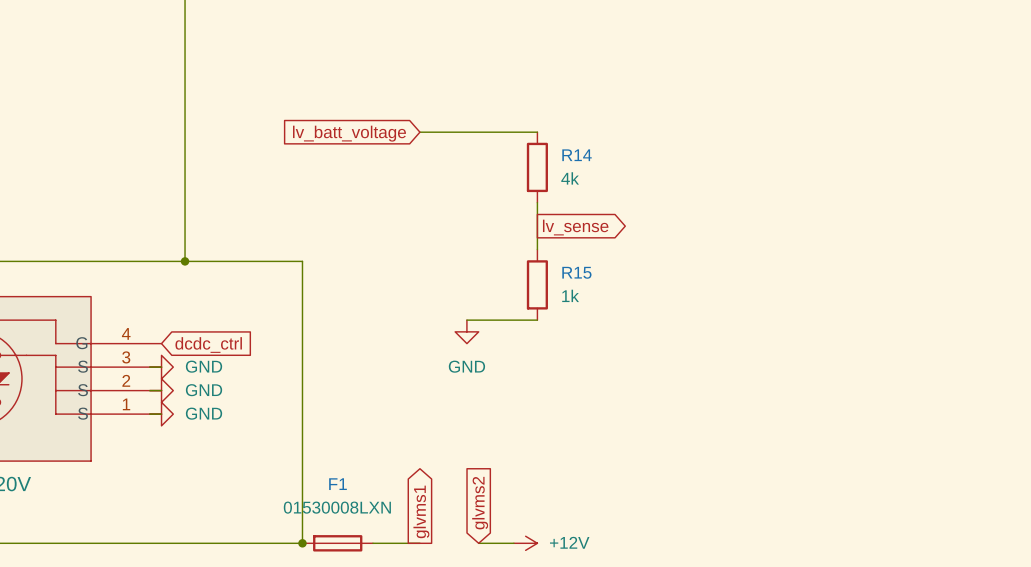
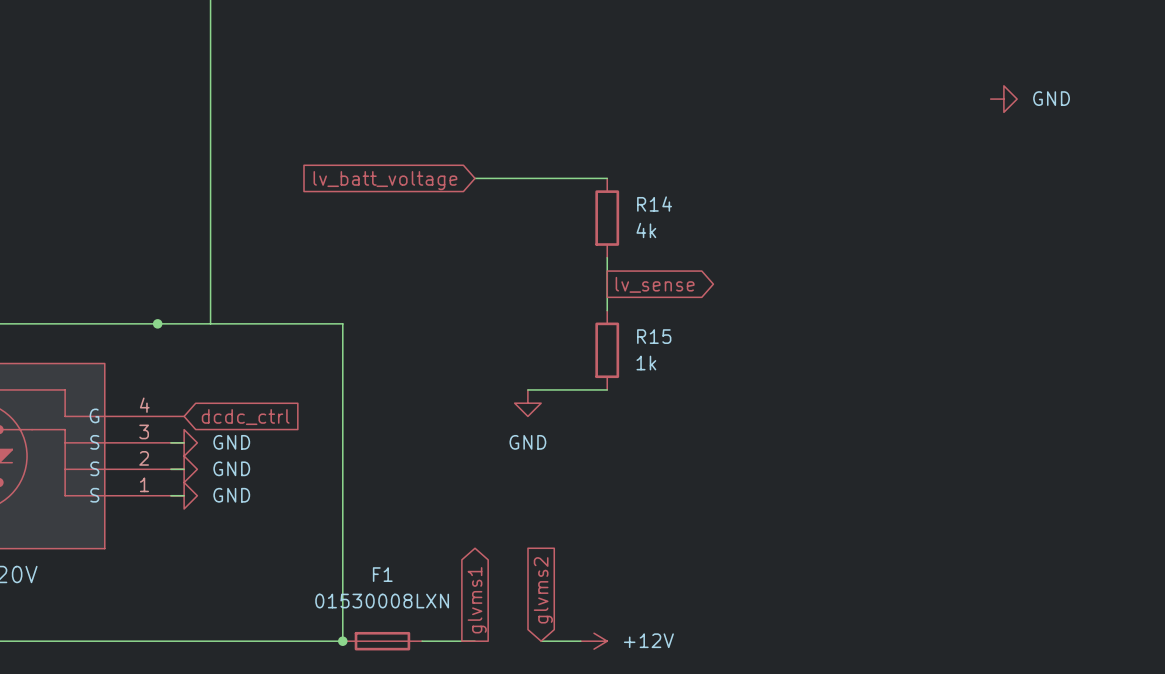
power symbol: none -> GND (1003, 99)
junction position: (185, 261) -> (157, 323)

